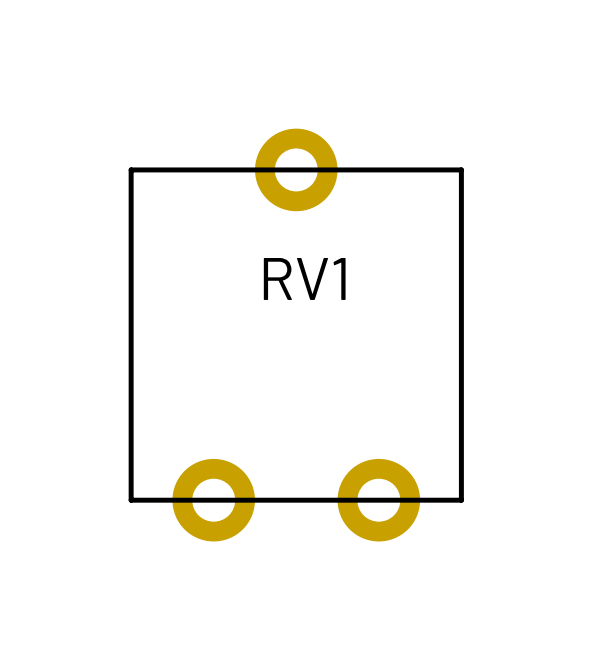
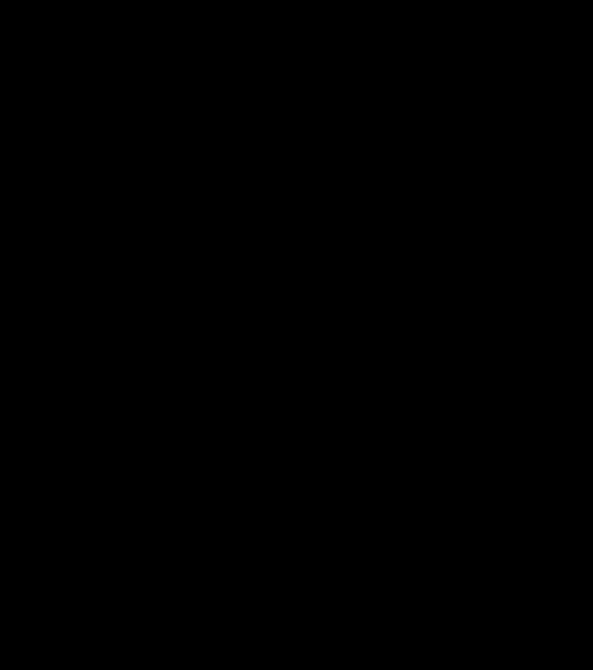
RV1: (296, 335) -> none

